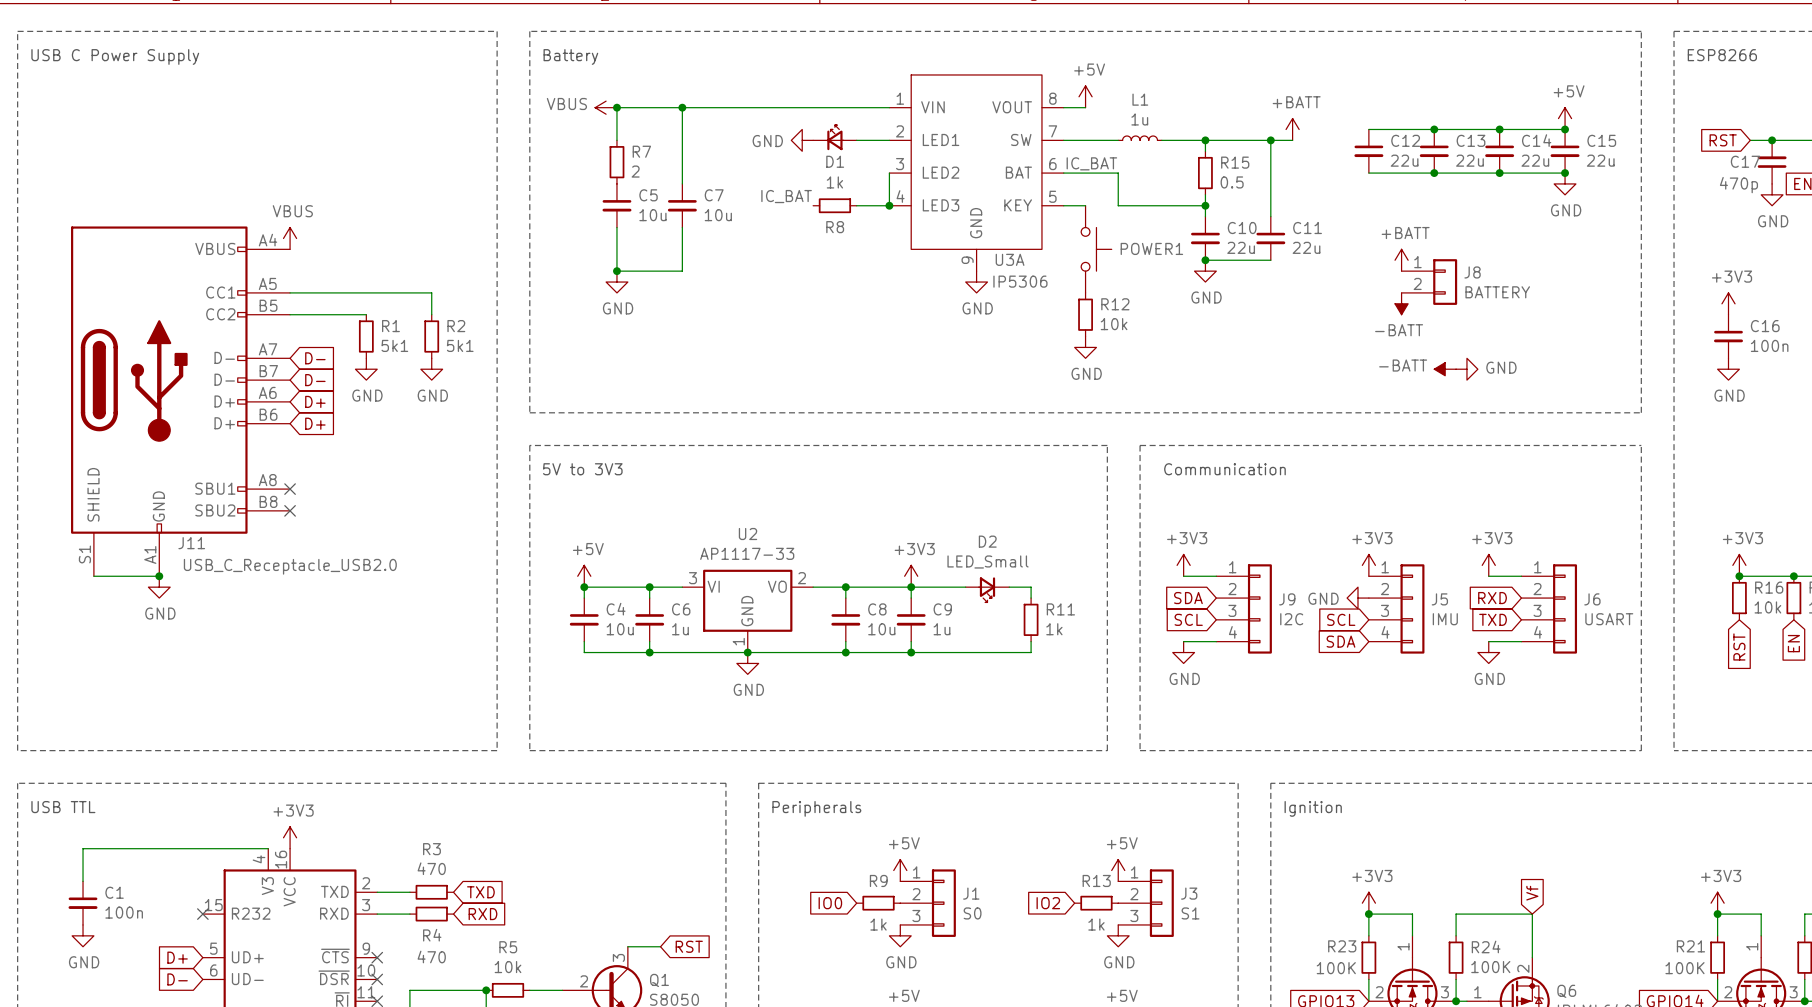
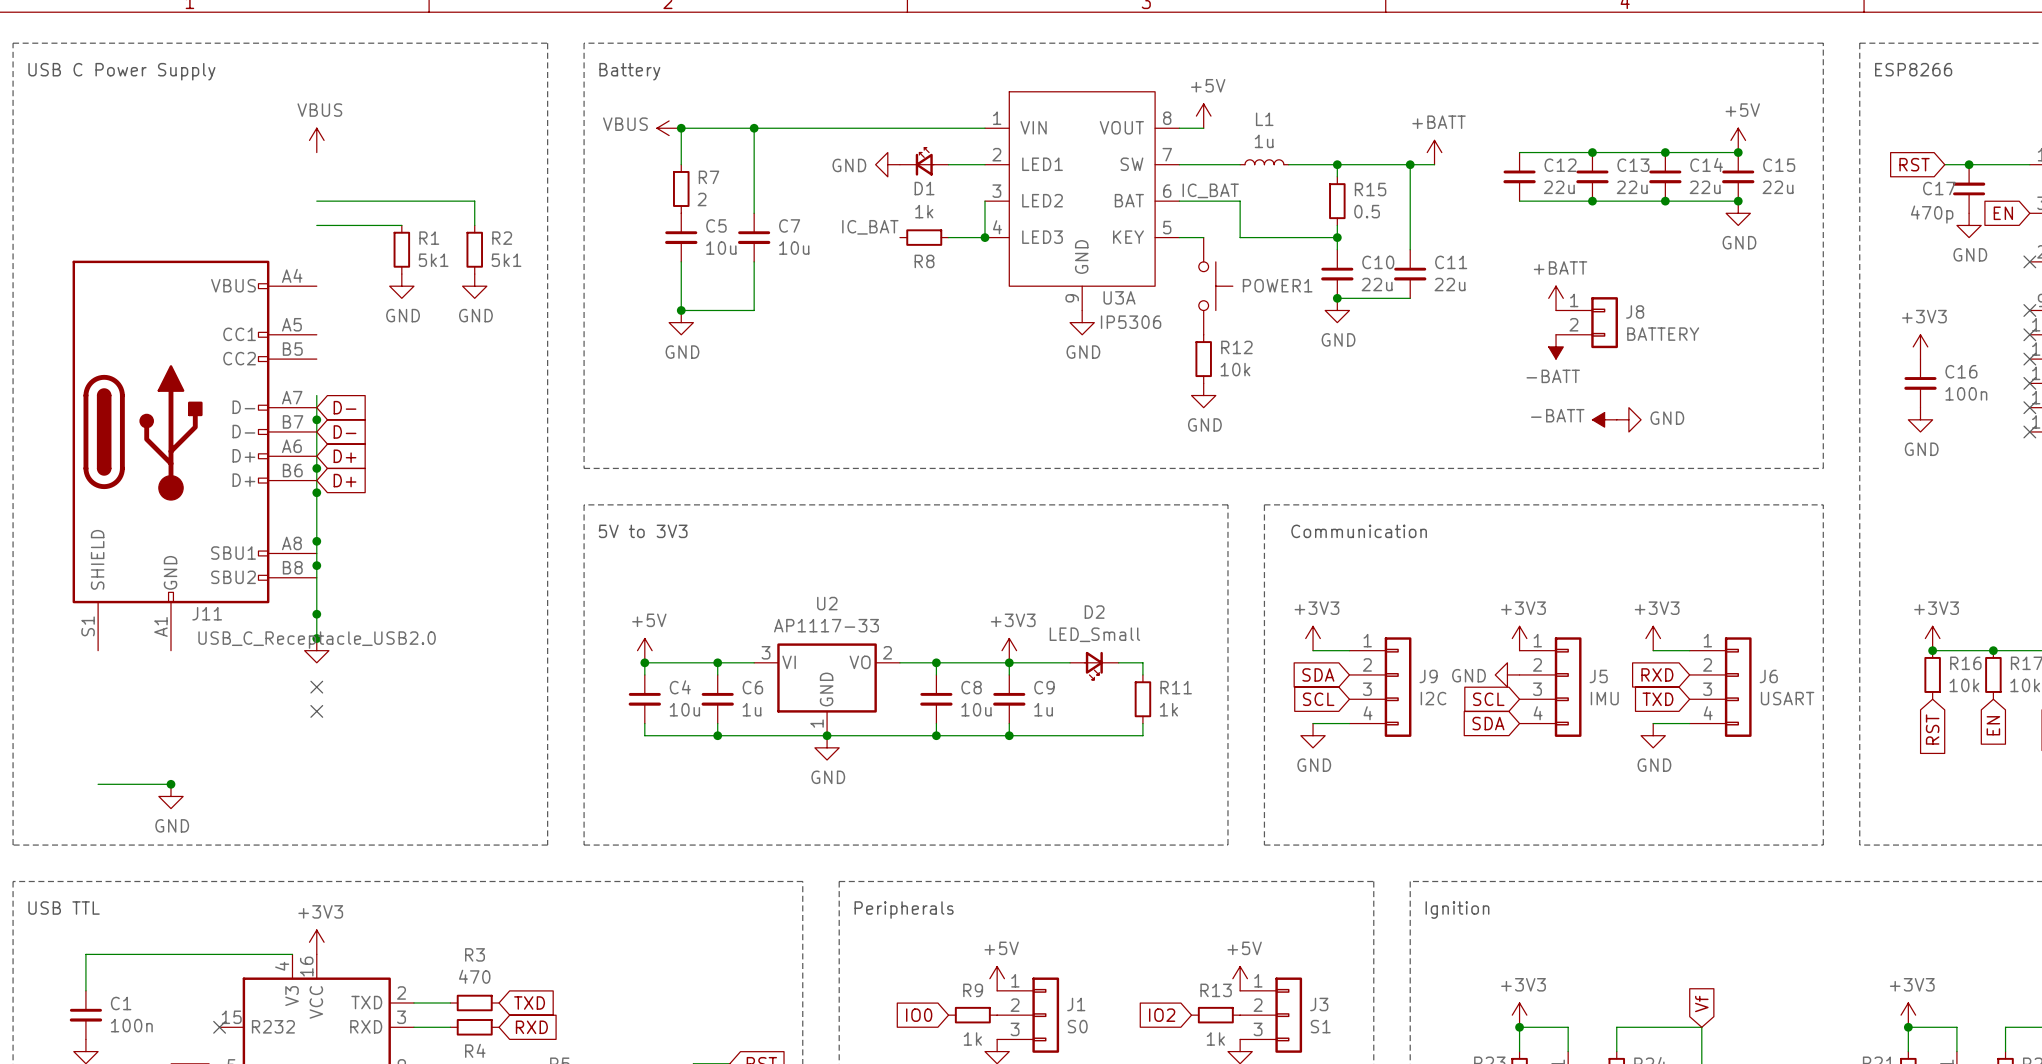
power symbol position: VBUS (290, 238) -> VBUS (316, 140)
power symbol: none -> GND (401, 286)
power symbol: none -> GND (474, 286)
wire: (290, 292) (431, 292) (431, 314) -> (316, 201) (474, 201) (474, 225)
wire: (290, 314) (366, 314) -> (316, 225) (401, 225)
R1 position: (366, 336) -> (401, 249)
R2 position: (431, 336) -> (474, 249)
wire: none -> (316, 395) (316, 638)
junction: none -> (316, 419)
power symbol: GND (366, 369) -> none
power symbol: GND (431, 369) -> none
junction: none -> (316, 468)
junction: none -> (316, 492)
junction: none -> (316, 541)
no-connect mark: (290, 489) -> none
junction: none -> (316, 565)
no-connect mark: (290, 510) -> none
junction: none -> (316, 614)
junction: none -> (316, 638)
wire: (93, 576) (159, 576) -> (98, 784) (170, 784)
junction: (159, 576) -> none
power symbol: none -> (316, 650)
power symbol position: GND (159, 587) -> GND (170, 796)
no-connect mark: none -> (316, 687)
no-connect mark: none -> (316, 711)
junction: none -> (170, 784)

